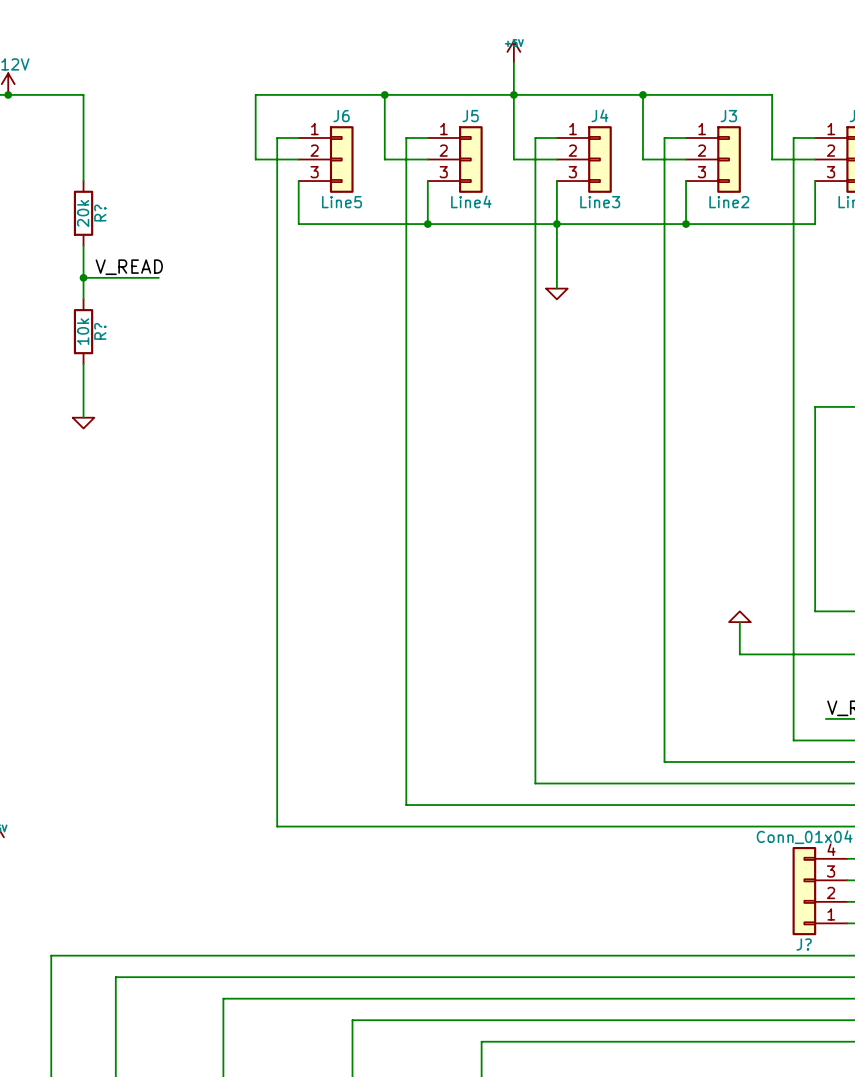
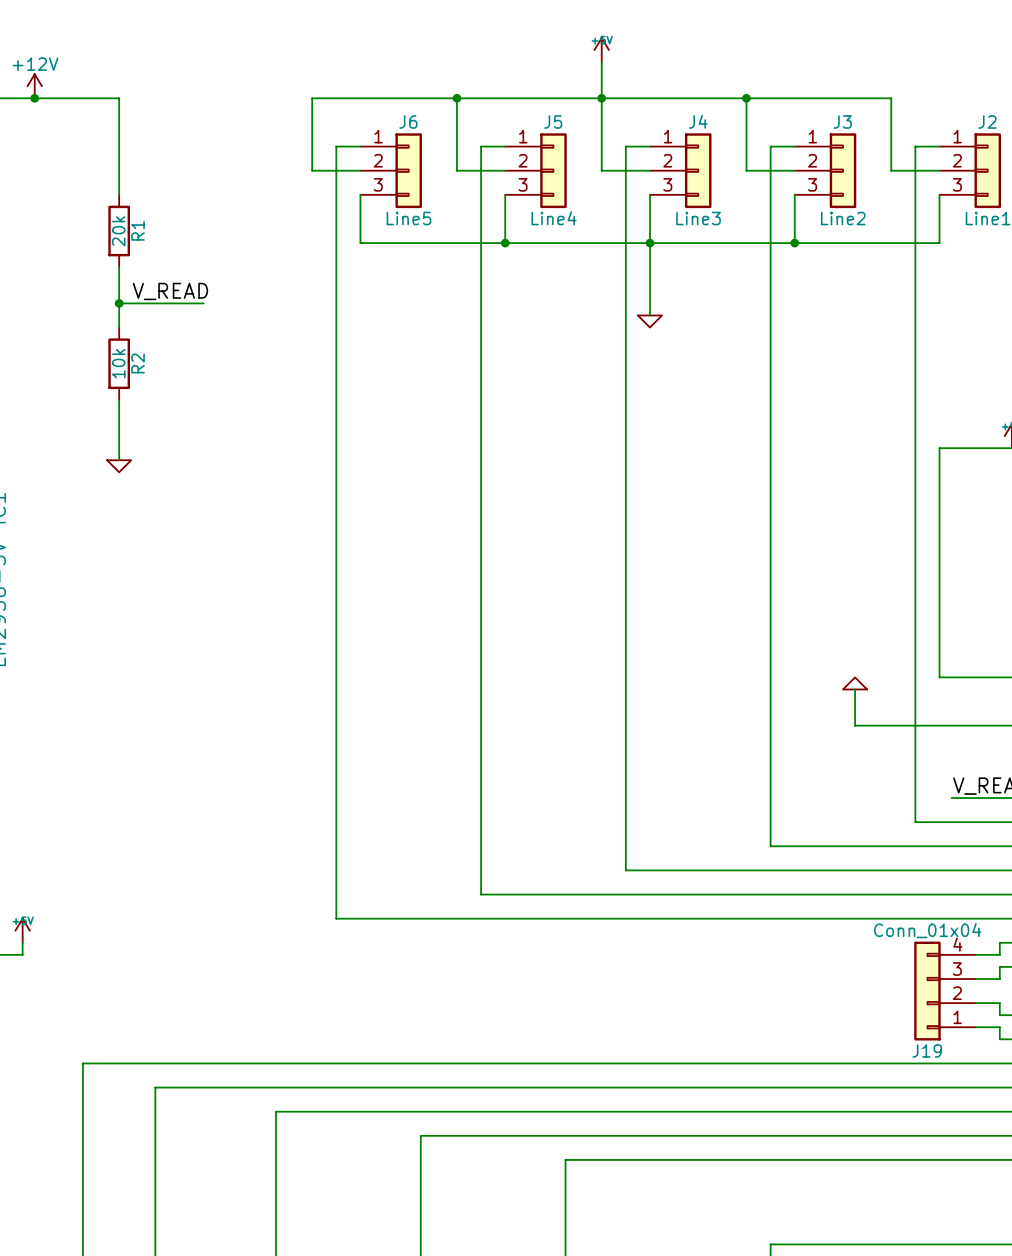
R? name: R? (100, 213) -> R1 (138, 230)
R? name: R? (100, 331) -> R2 (138, 363)
J? name: J? (804, 944) -> J19 (927, 1050)

